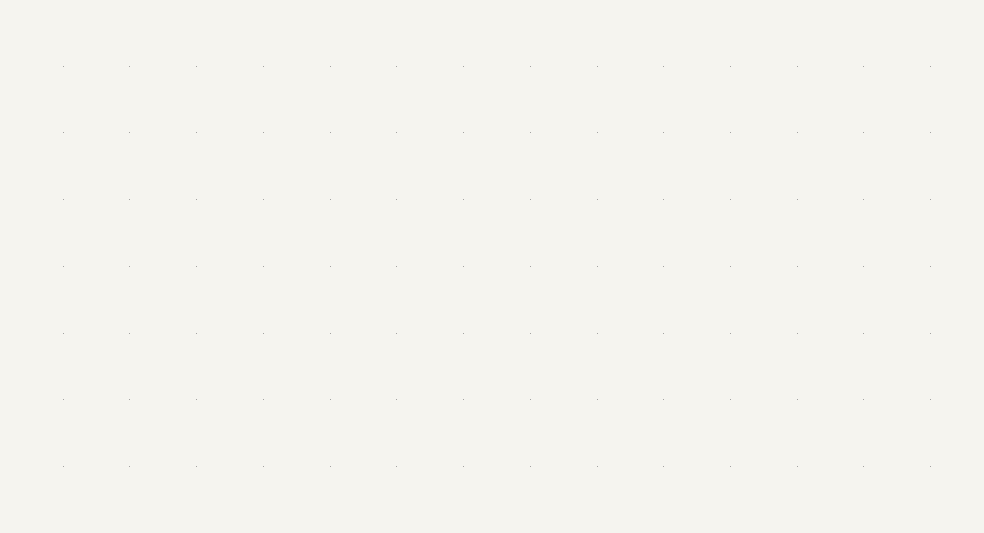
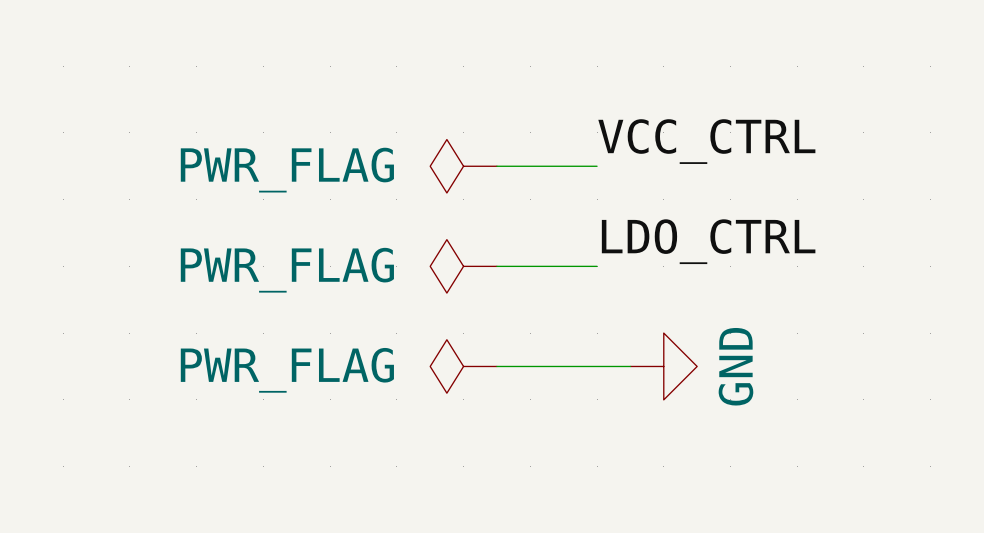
label: none -> VCC_CTRL (706, 141)
power symbol: none -> PWR_FLAG (463, 166)
wire: none -> (496, 166) (597, 166)
label: none -> LDO_CTRL (708, 241)
power symbol: none -> PWR_FLAG (463, 266)
wire: none -> (496, 266) (597, 266)
power symbol: none -> PWR_FLAG (463, 366)
wire: none -> (496, 366) (630, 366)
power symbol: none -> GND (663, 366)

